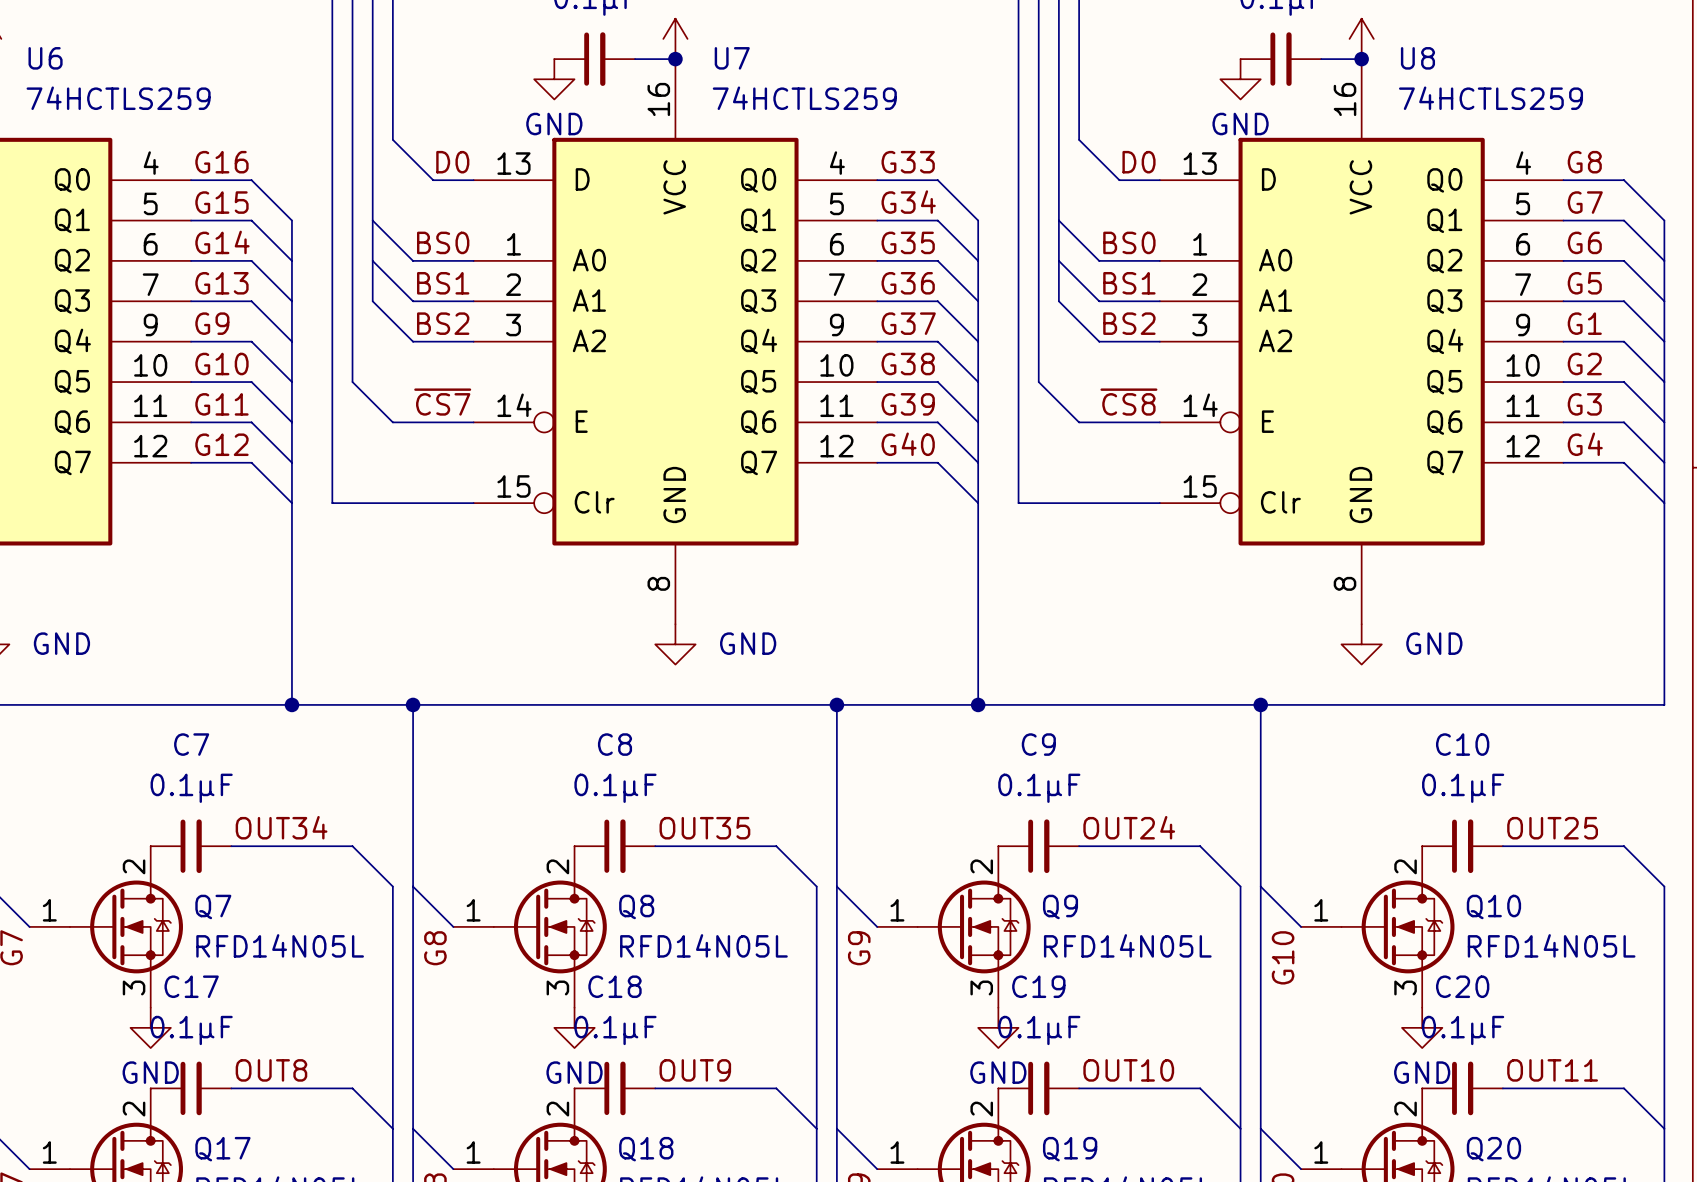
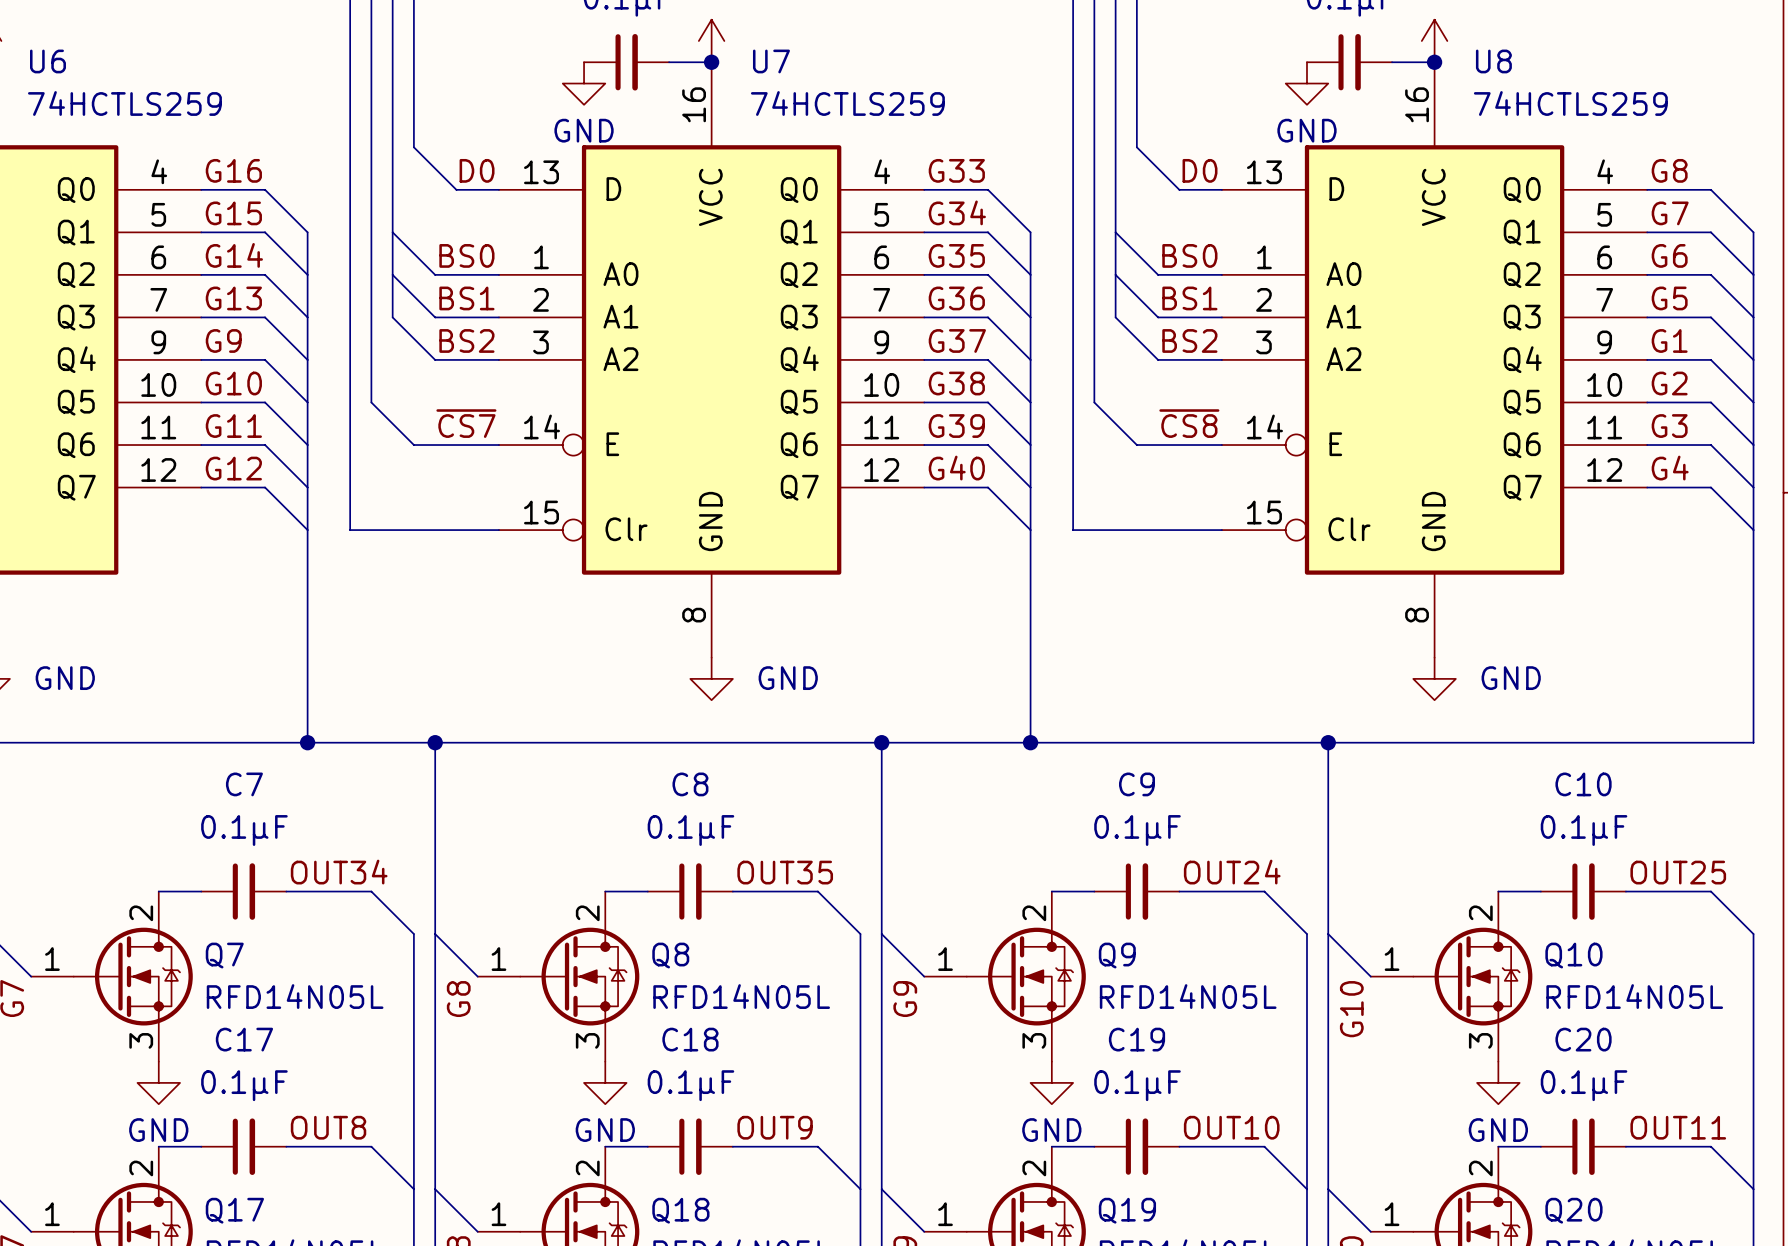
label position: OUT34 (281, 827) -> OUT34 (339, 872)
label position: OUT24 (1129, 827) -> OUT24 (1232, 872)
label position: OUT35 (704, 828) -> OUT35 (785, 872)
label position: OUT25 (1552, 828) -> OUT25 (1678, 872)
C7 position: (191, 846) -> (243, 891)
C8 position: (614, 846) -> (690, 891)
C9 position: (1038, 846) -> (1136, 891)
C10 position: (1462, 846) -> (1583, 891)
label position: OUT8 (271, 1070) -> OUT8 (328, 1127)
label position: OUT9 (695, 1070) -> OUT9 (775, 1127)
label position: OUT10 (1128, 1070) -> OUT10 (1231, 1127)
label position: OUT11 (1552, 1070) -> OUT11 (1678, 1127)
C17 position: (191, 1088) -> (243, 1146)
C18 position: (614, 1088) -> (690, 1146)
C19 position: (1038, 1088) -> (1136, 1146)
C20 position: (1462, 1088) -> (1583, 1146)

